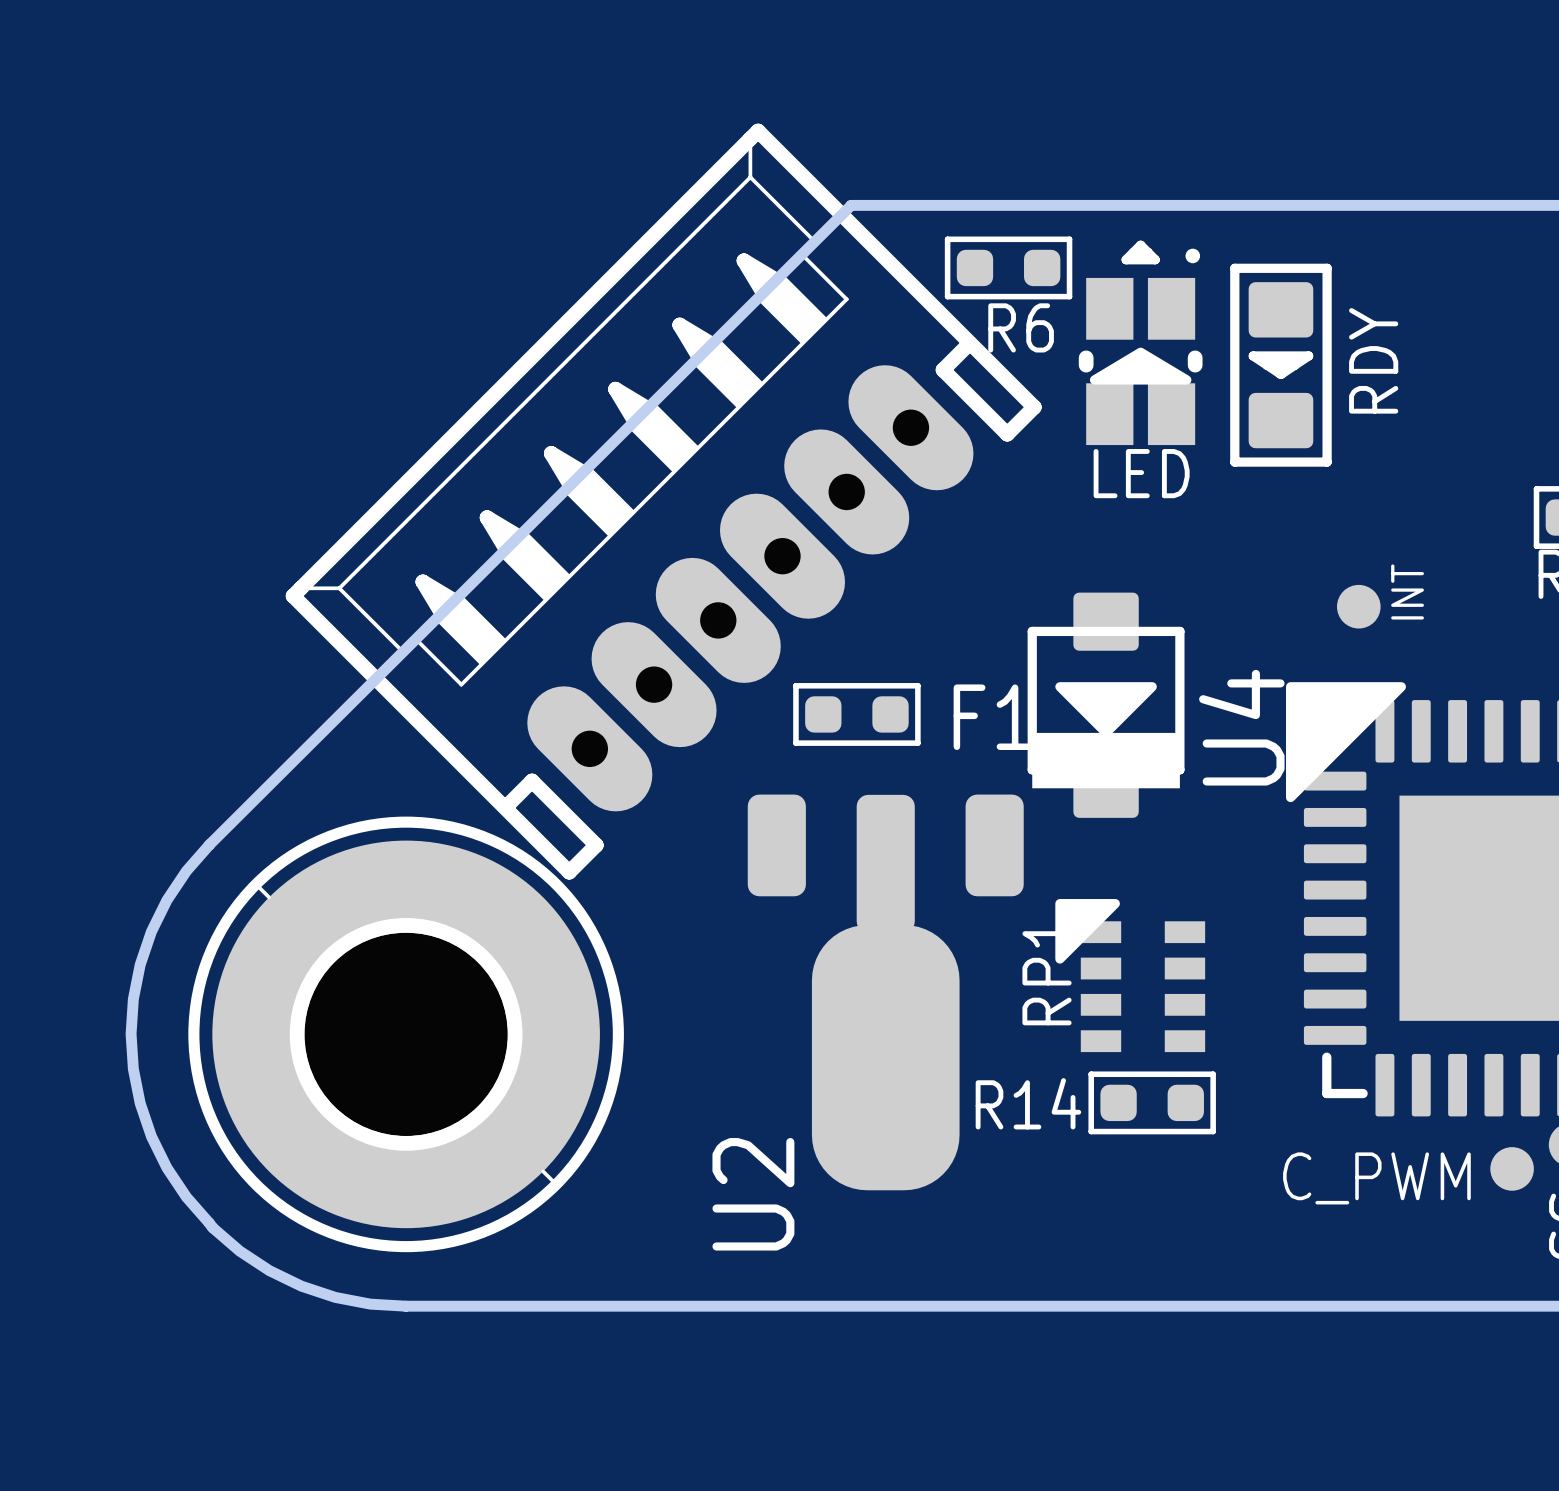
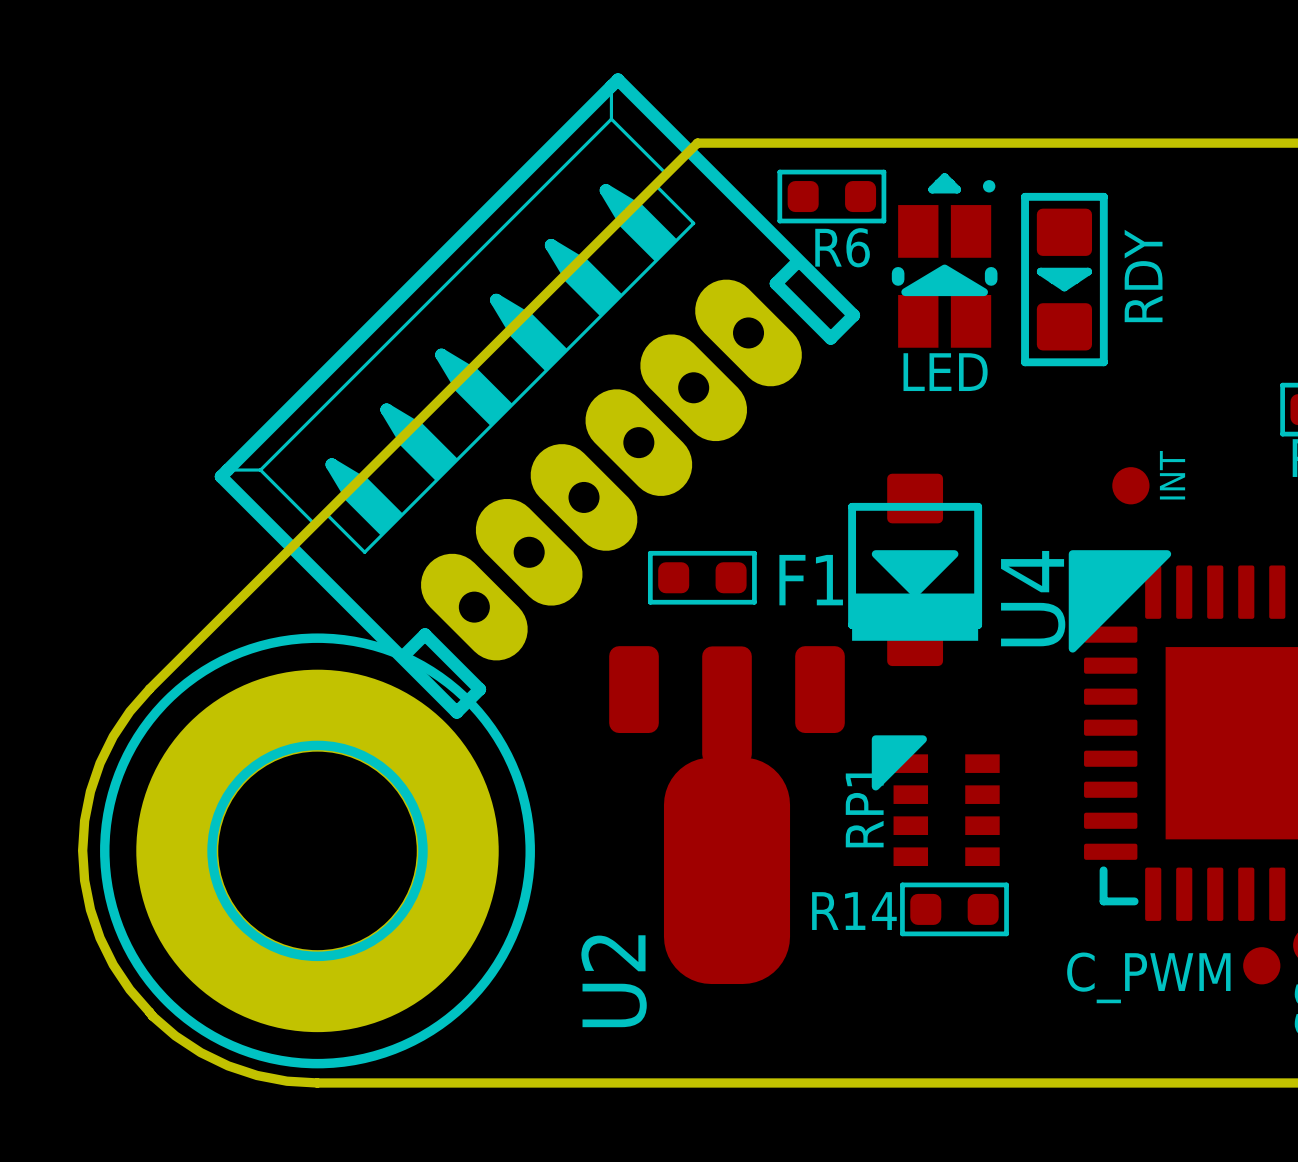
part footprint: [188, 816, 624, 1253] -> [100, 633, 535, 1069]

